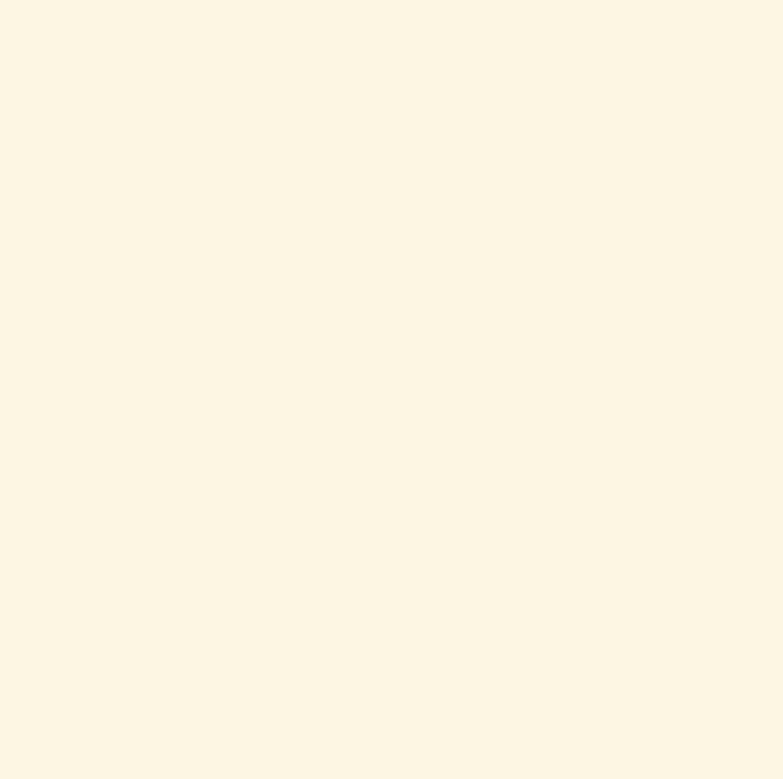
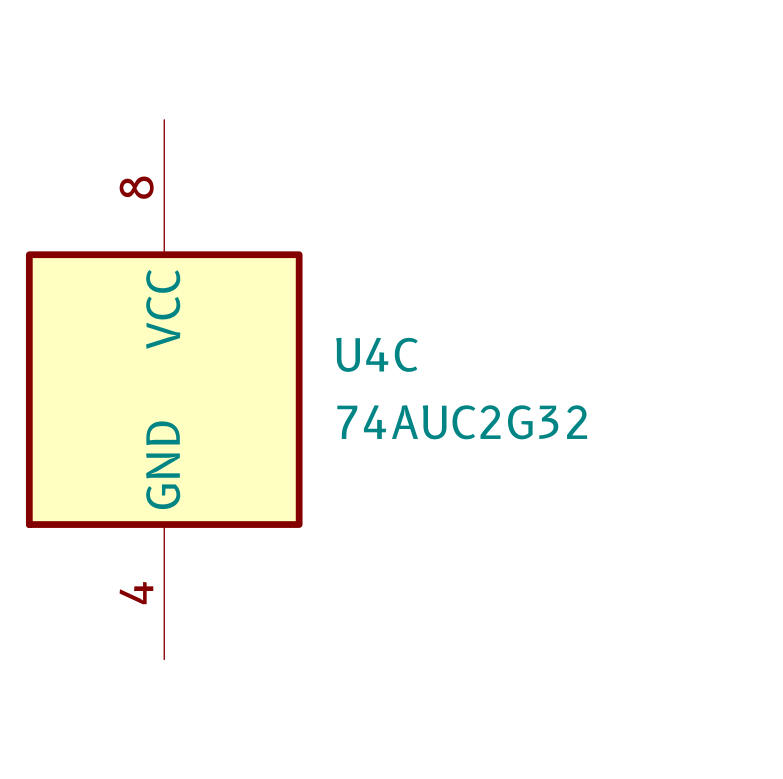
U4C: none -> 74AUC2G32 (164, 389)

